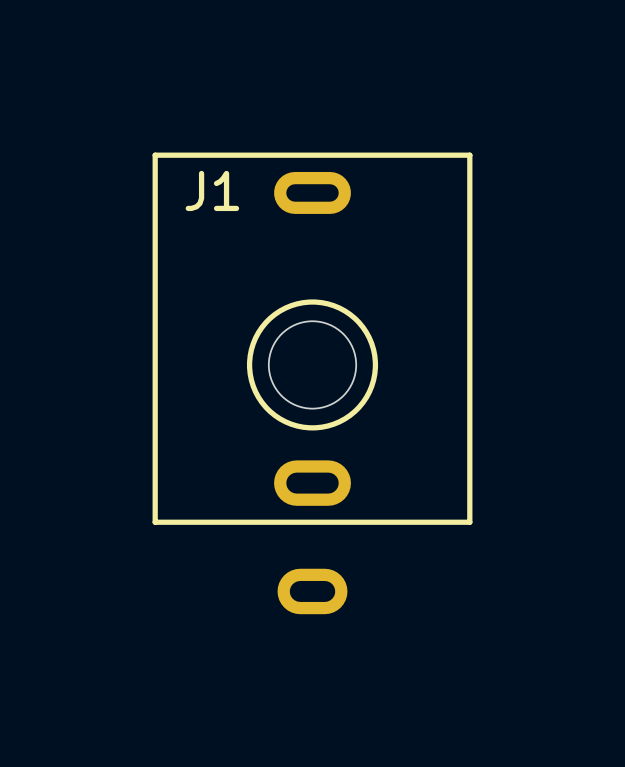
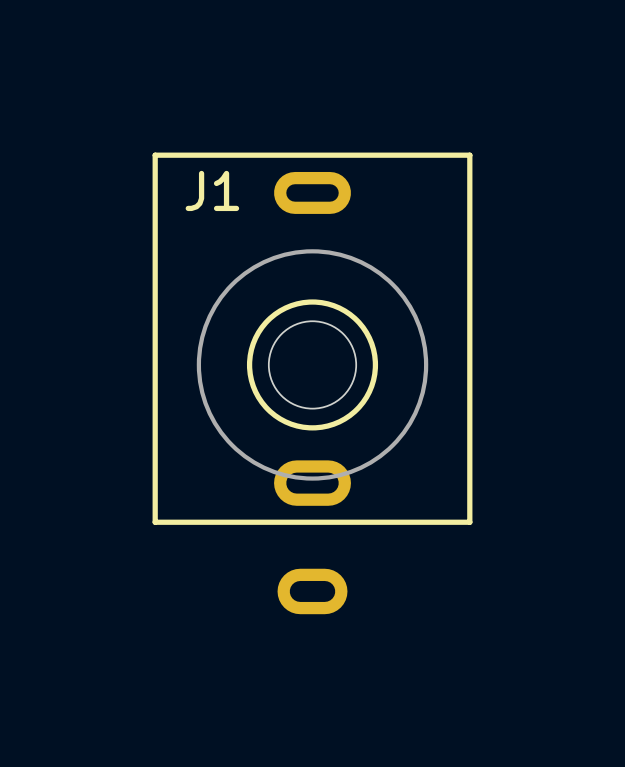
drawing: none -> [196, 249, 429, 481]

